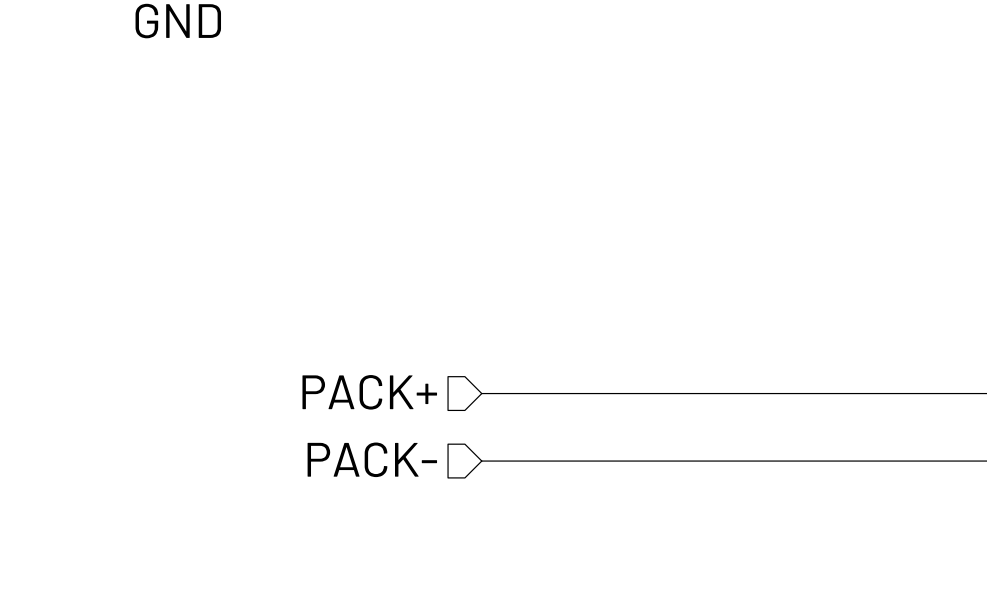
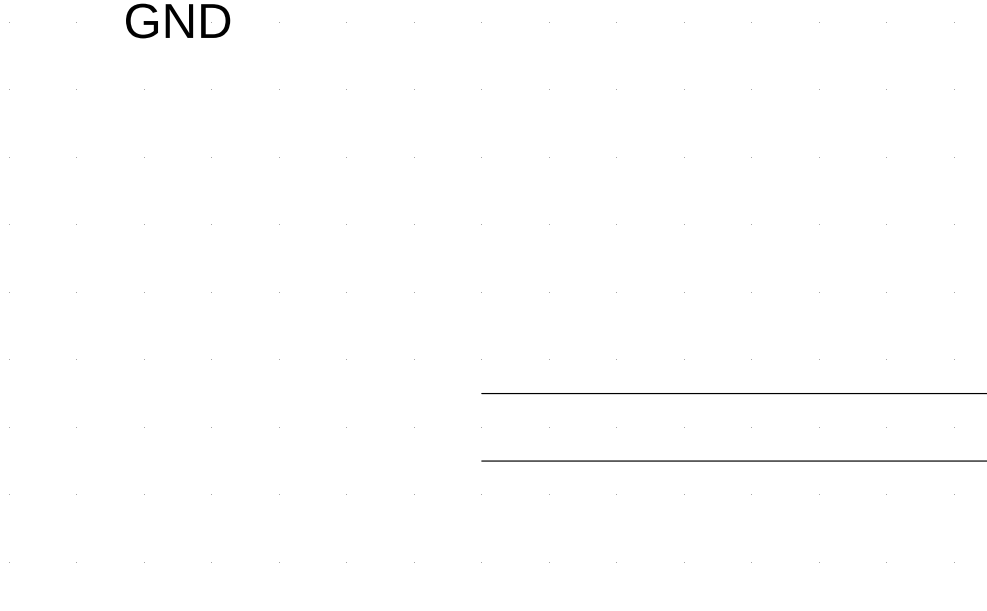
hierarchical label: PACK+ (369, 392) -> none
hierarchical label: PACK- (372, 459) -> none

